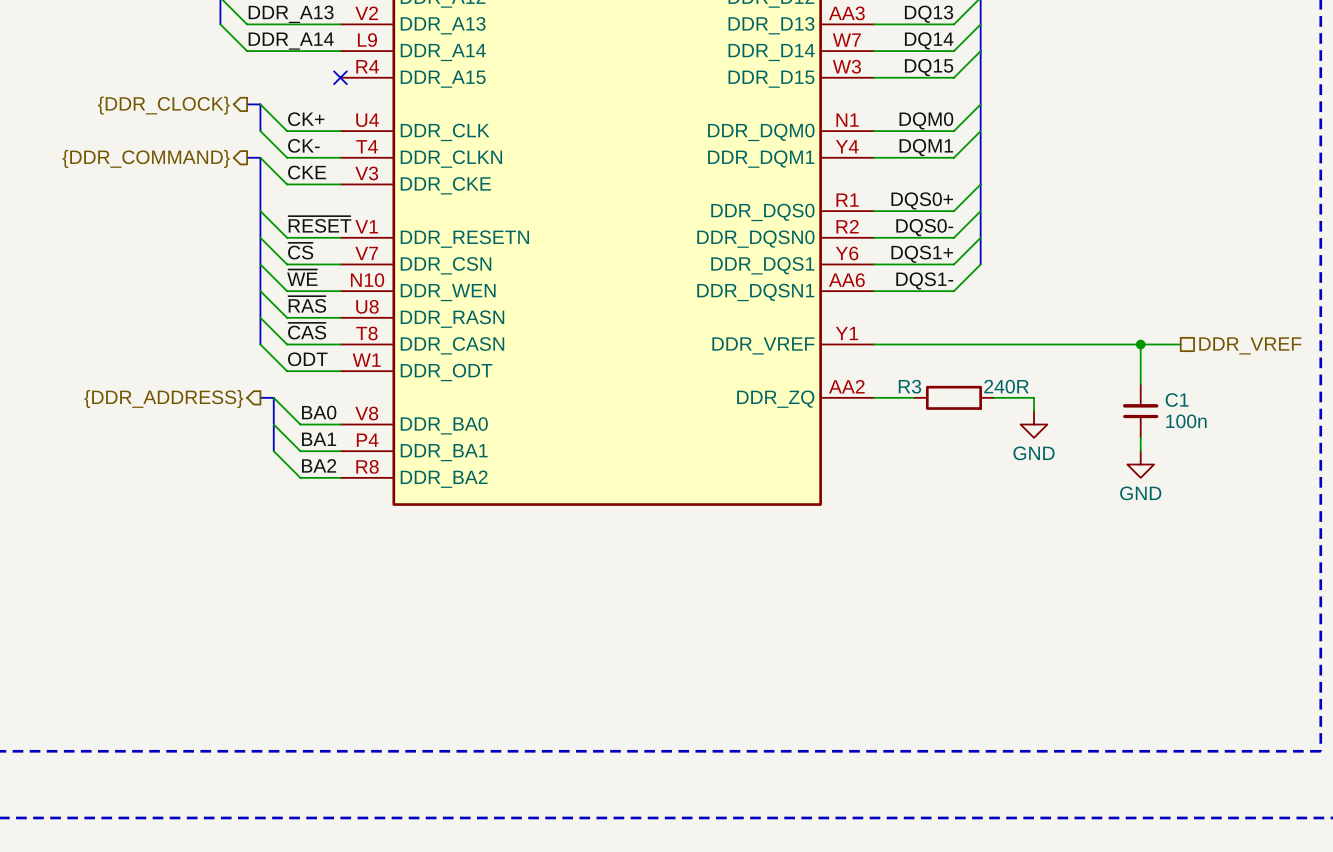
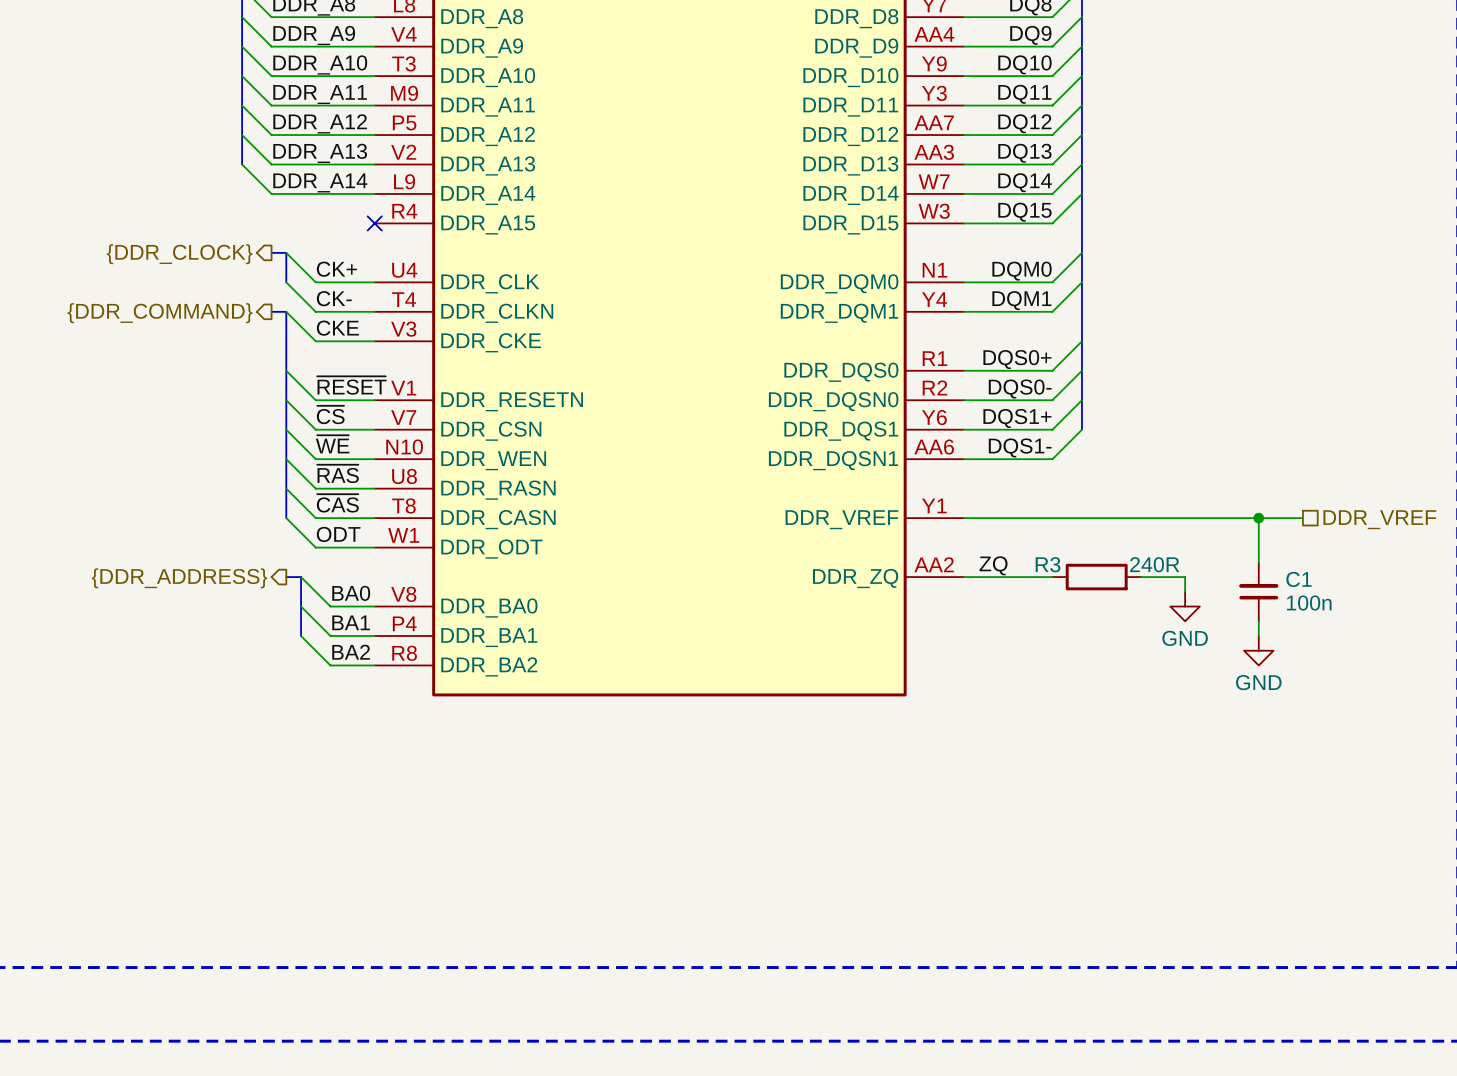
label: none -> ZQ (993, 565)
wire: none -> (1008, 577) (1052, 577)
R3 position: (953, 397) -> (1096, 577)
wire: (993, 397) (1034, 397) (1034, 411) -> (1140, 577) (1185, 577) (1185, 591)
power symbol position: GND (1034, 424) -> GND (1185, 606)

